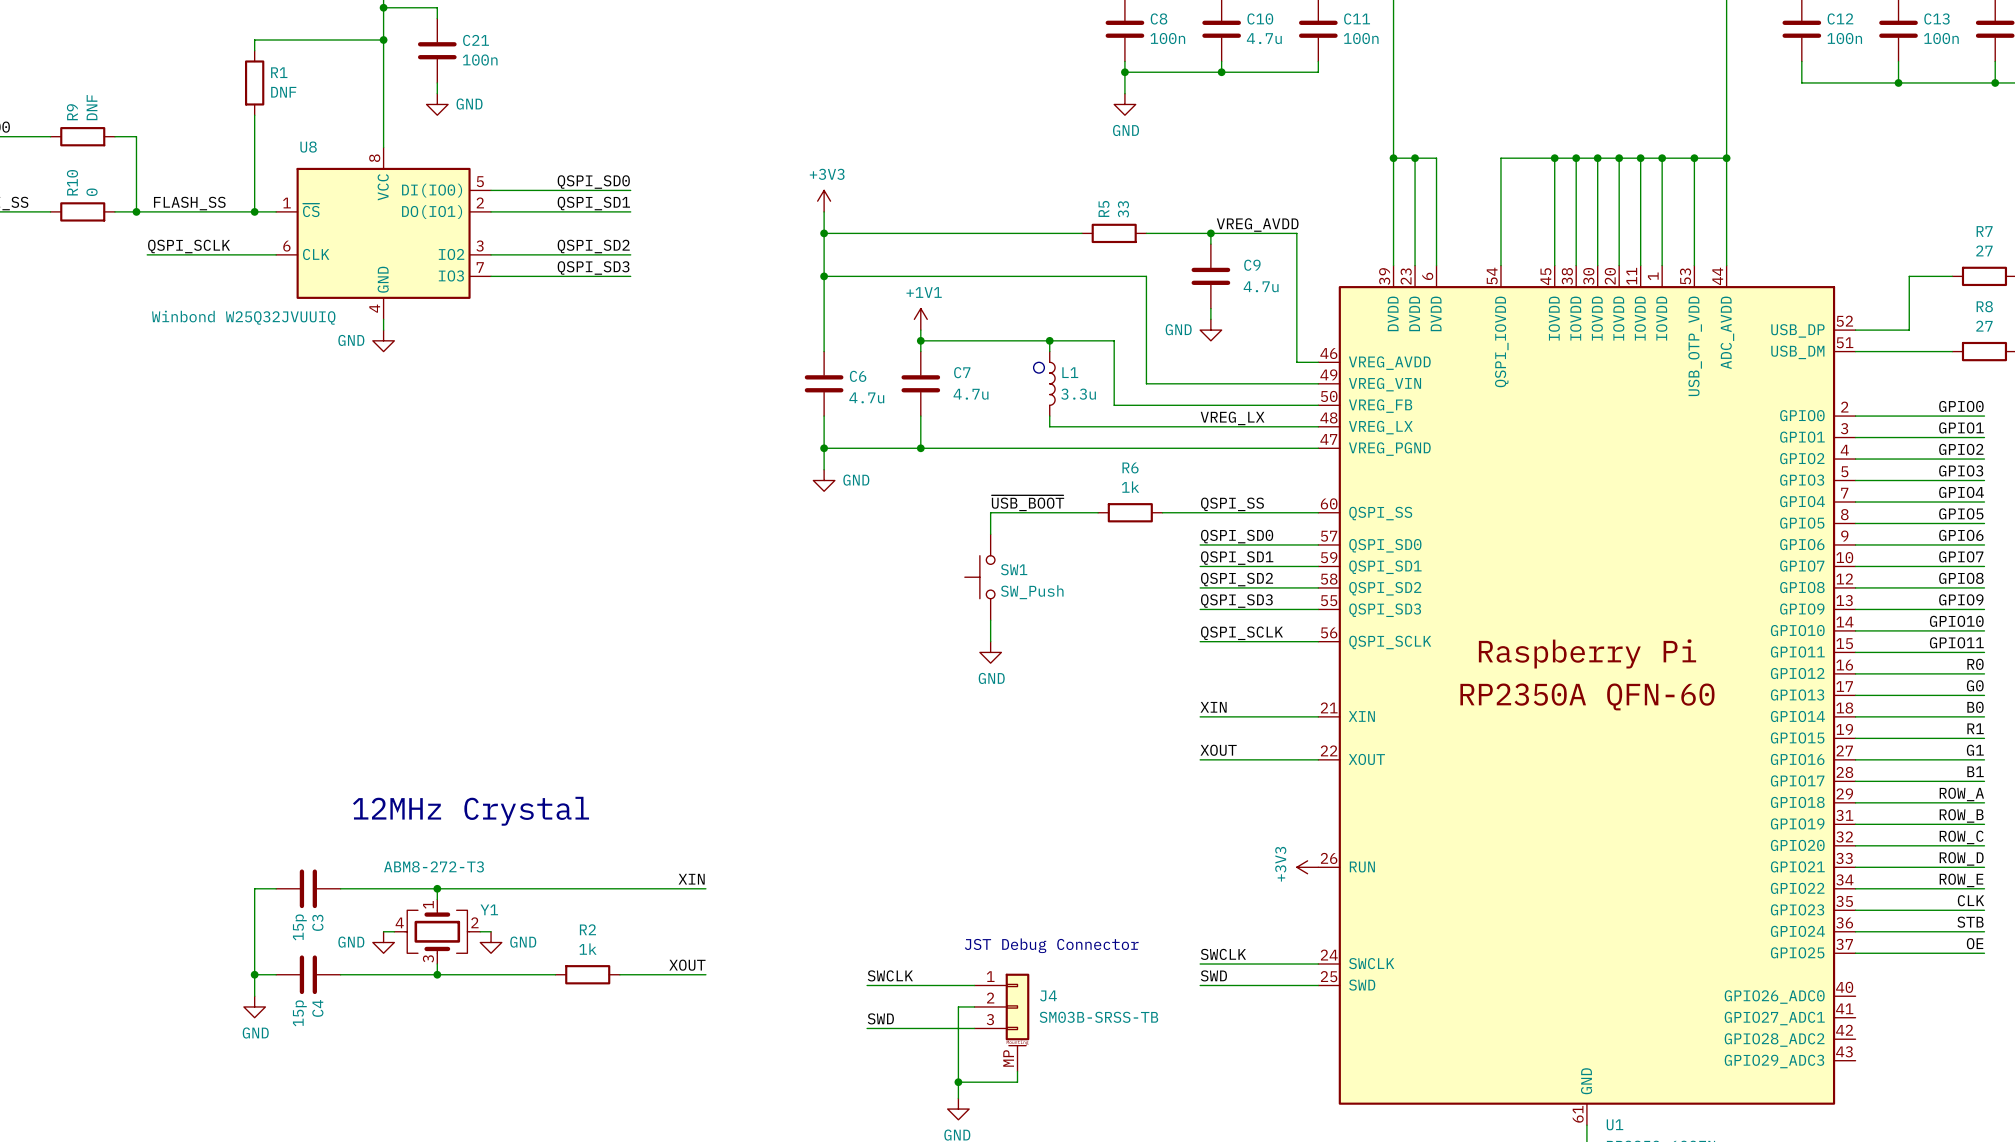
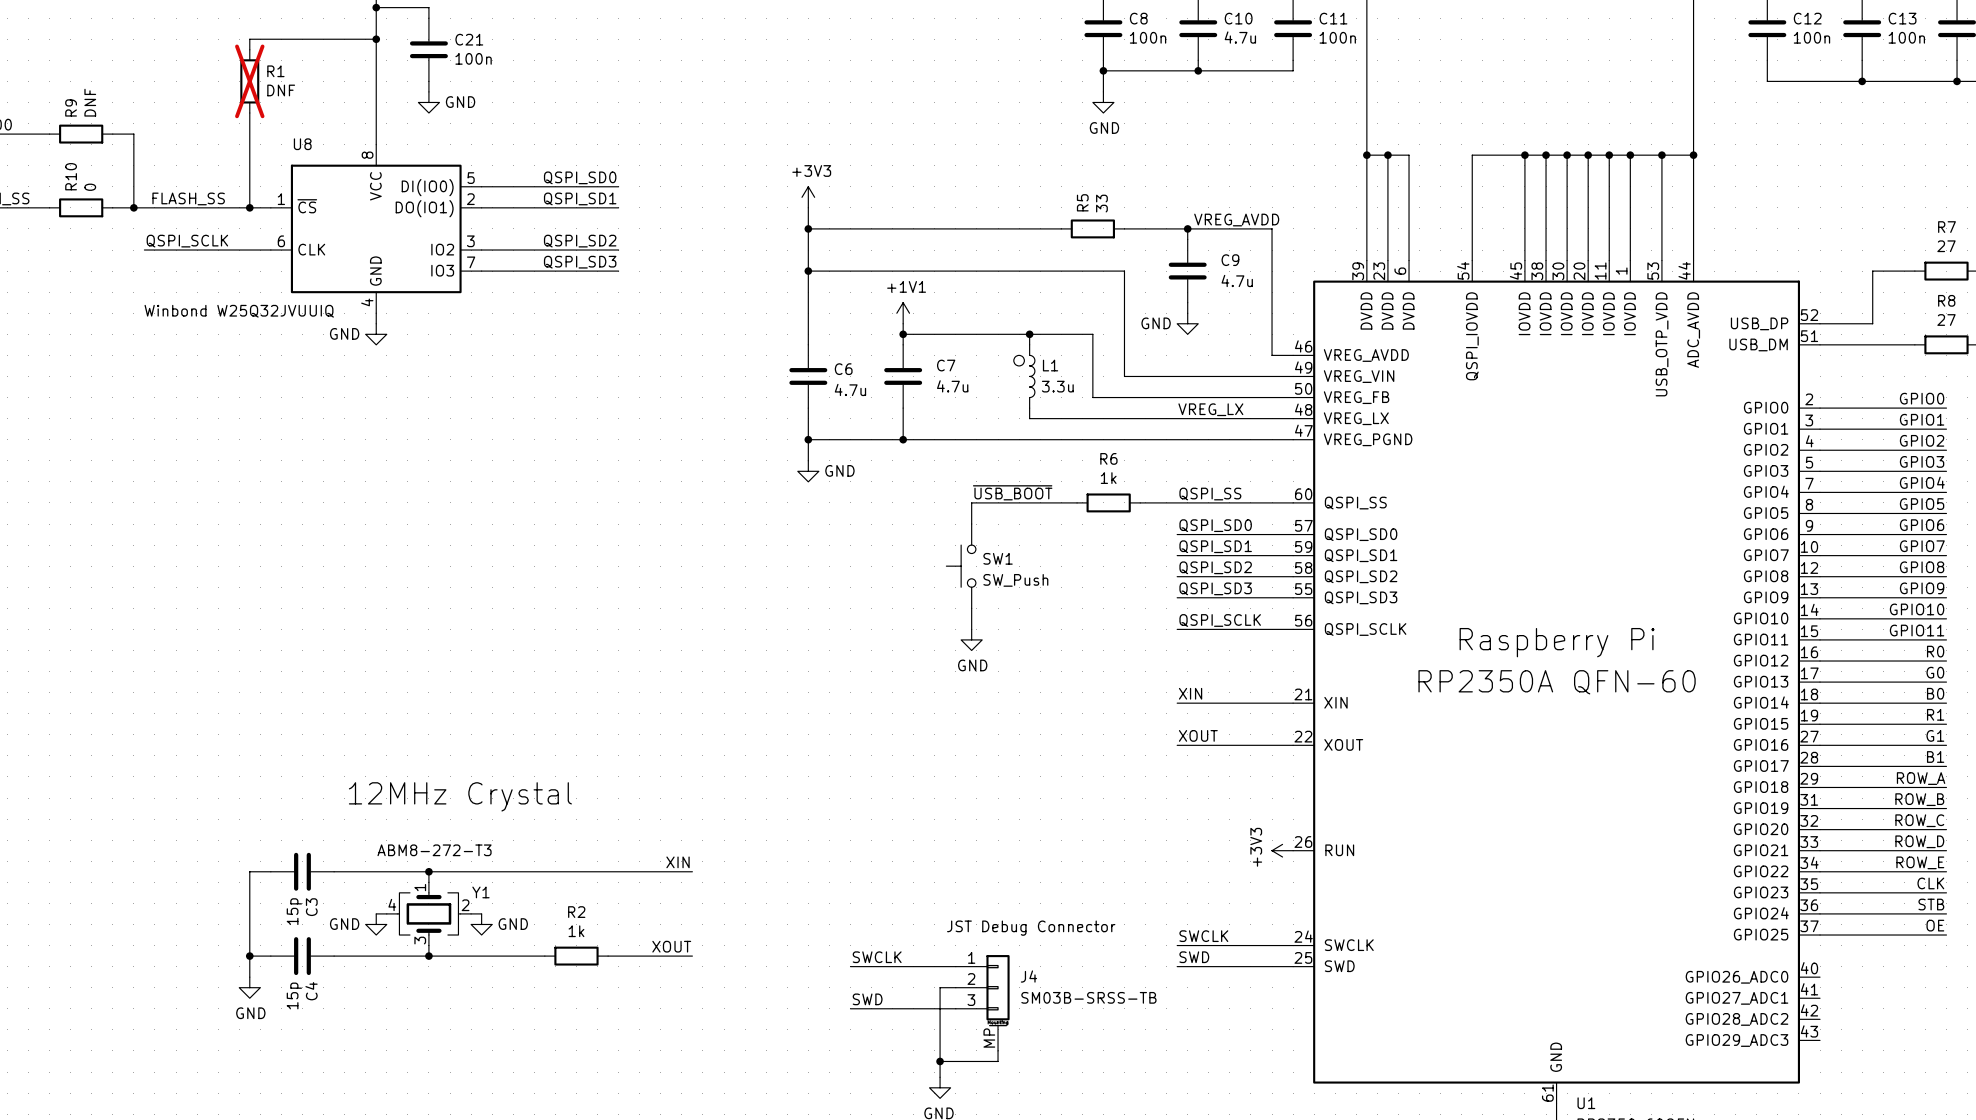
R1 do-not-place cross: none -> (249, 81)

